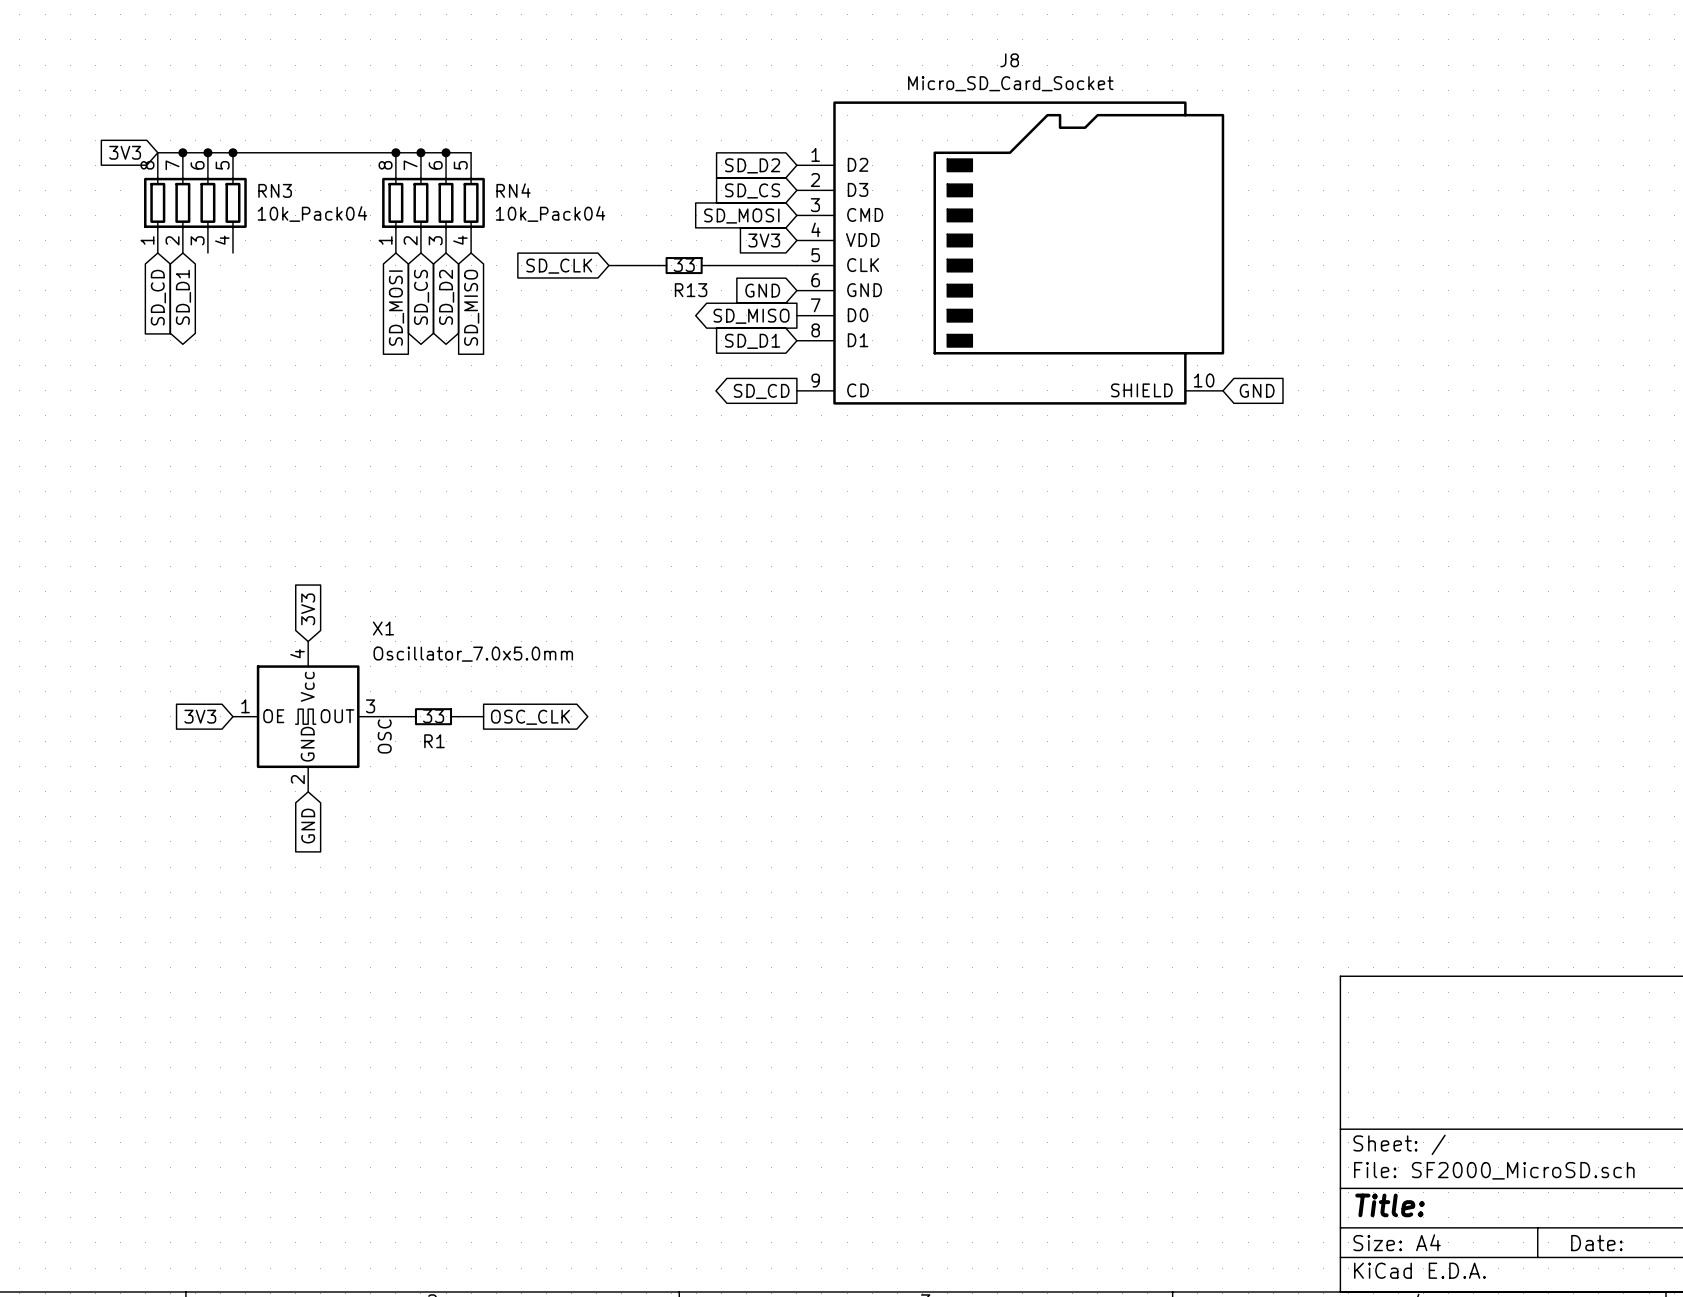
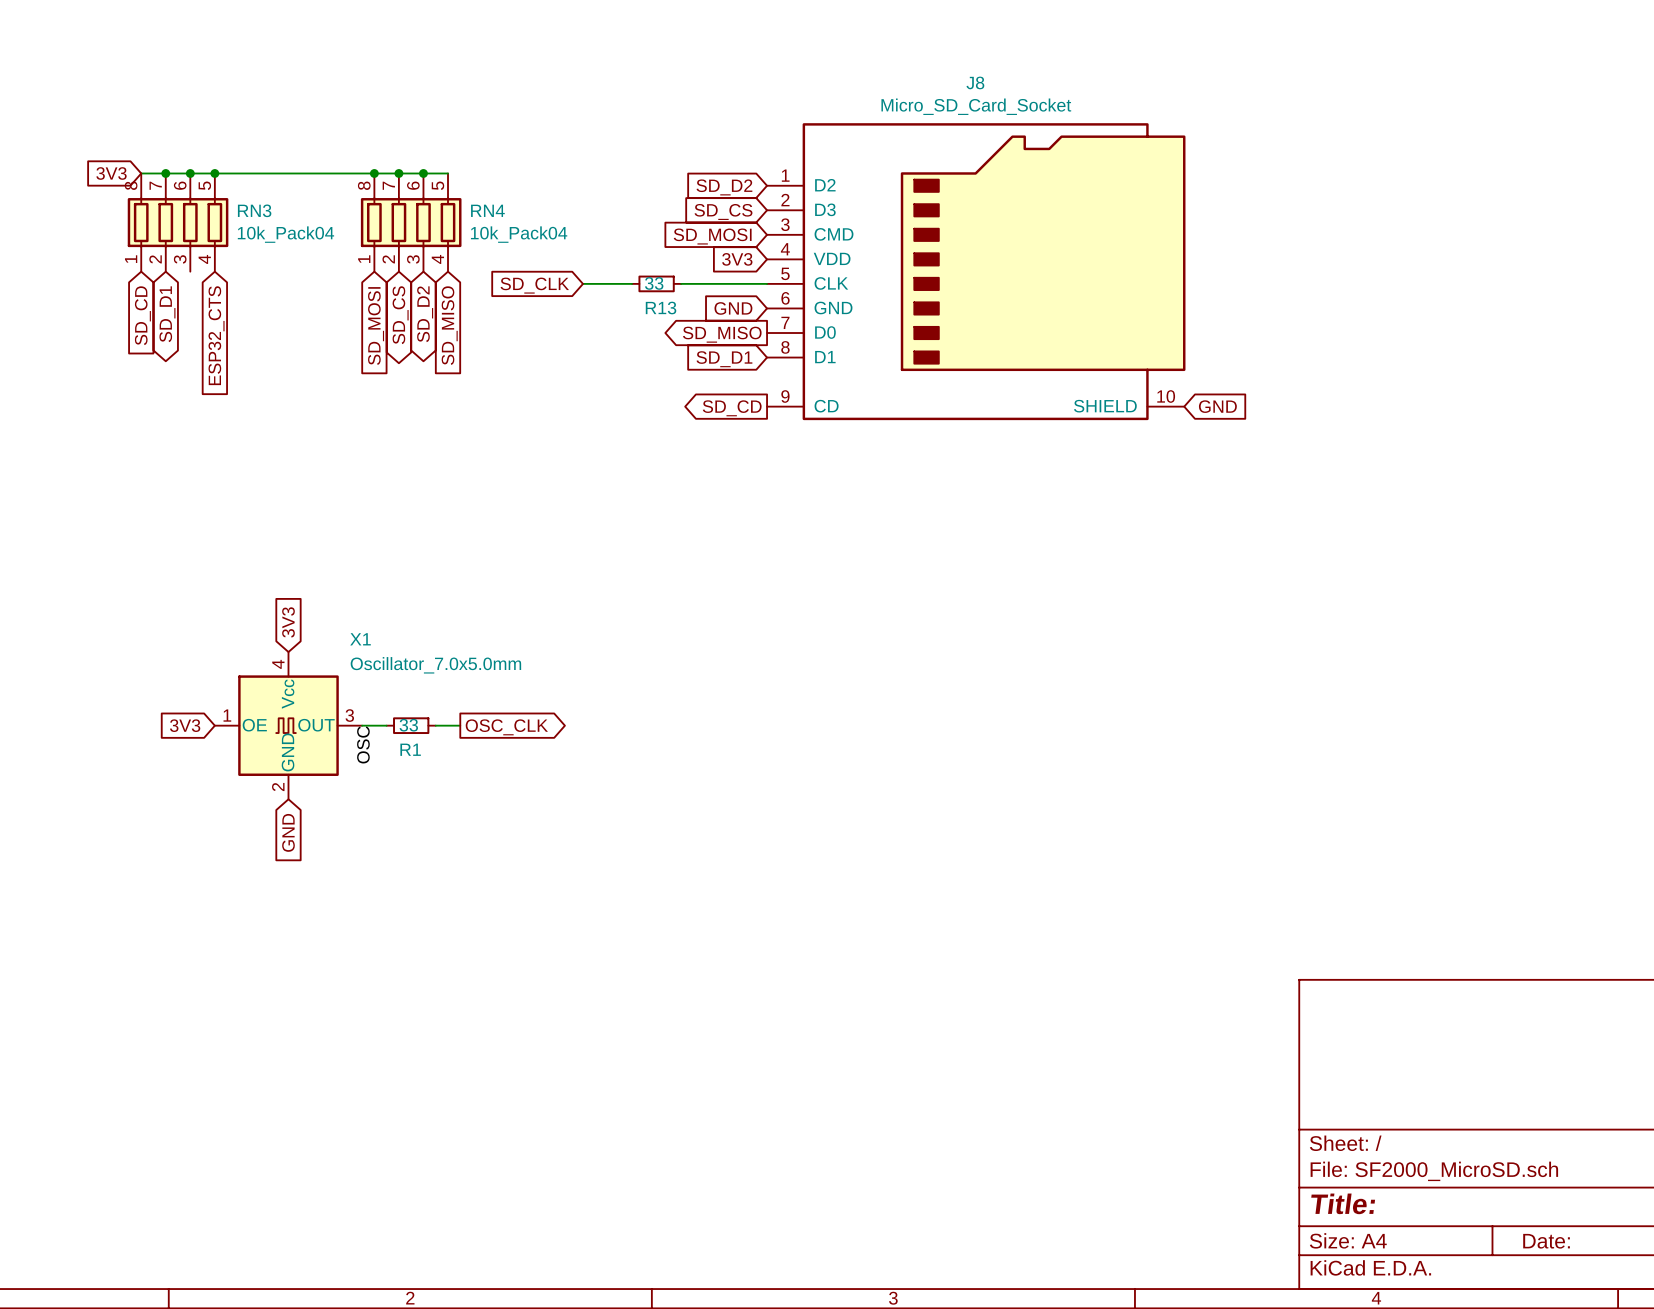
global label: none -> ESP32_CTS (216, 335)

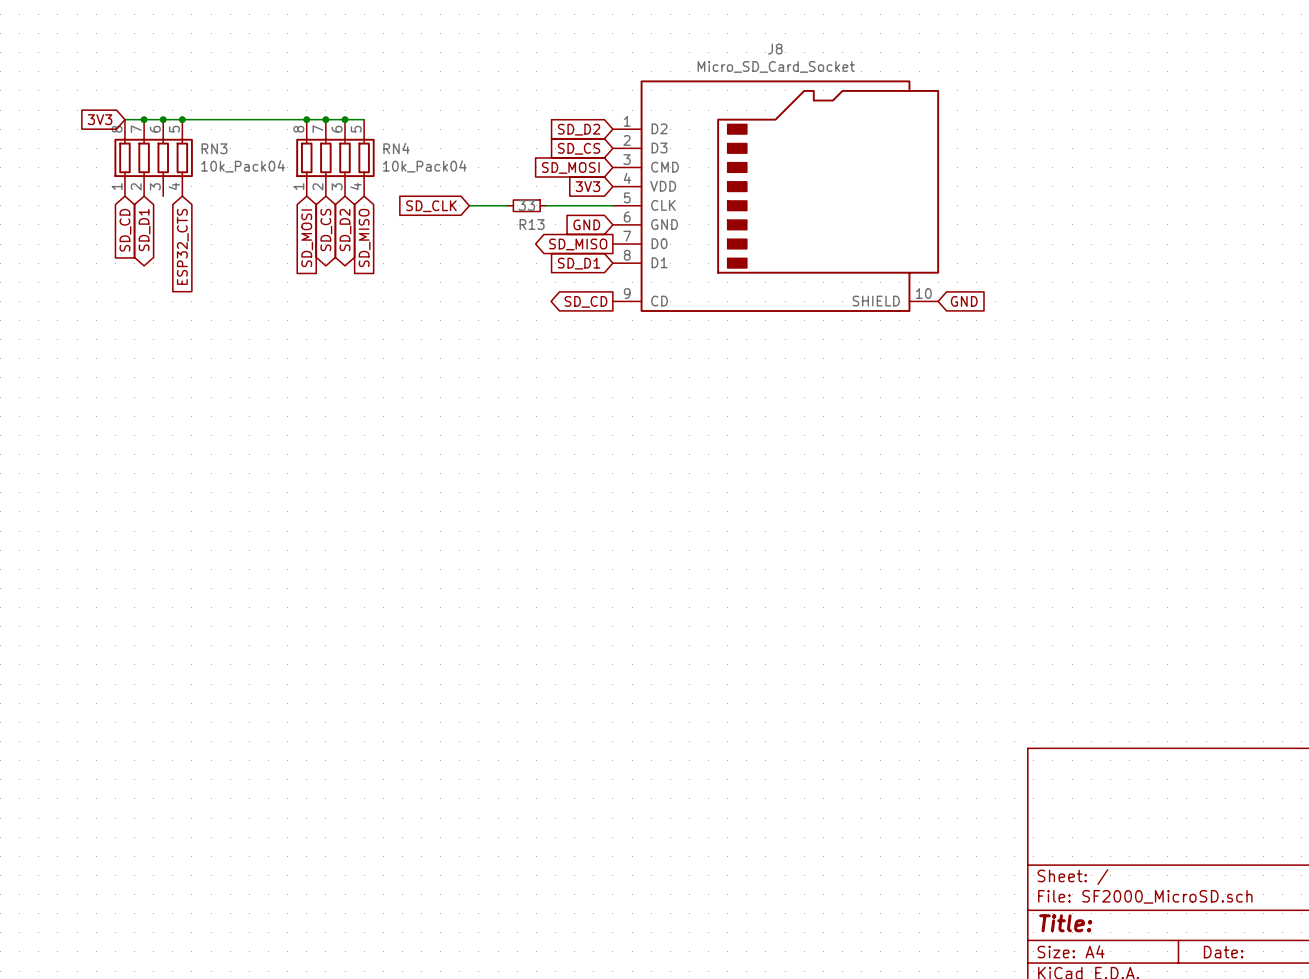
global label: 3V3 (288, 622) -> none
global label: 3V3 (185, 725) -> none
X1: Oscillator_7.0x5.0mm (288, 725) -> none
wire: (362, 725) (386, 725) -> none
R1: 33 (411, 725) -> none
wire: (435, 725) (460, 725) -> none
global label: OSC_CLK (506, 727) -> none
label: OSC (363, 744) -> none
global label: GND (288, 832) -> none

